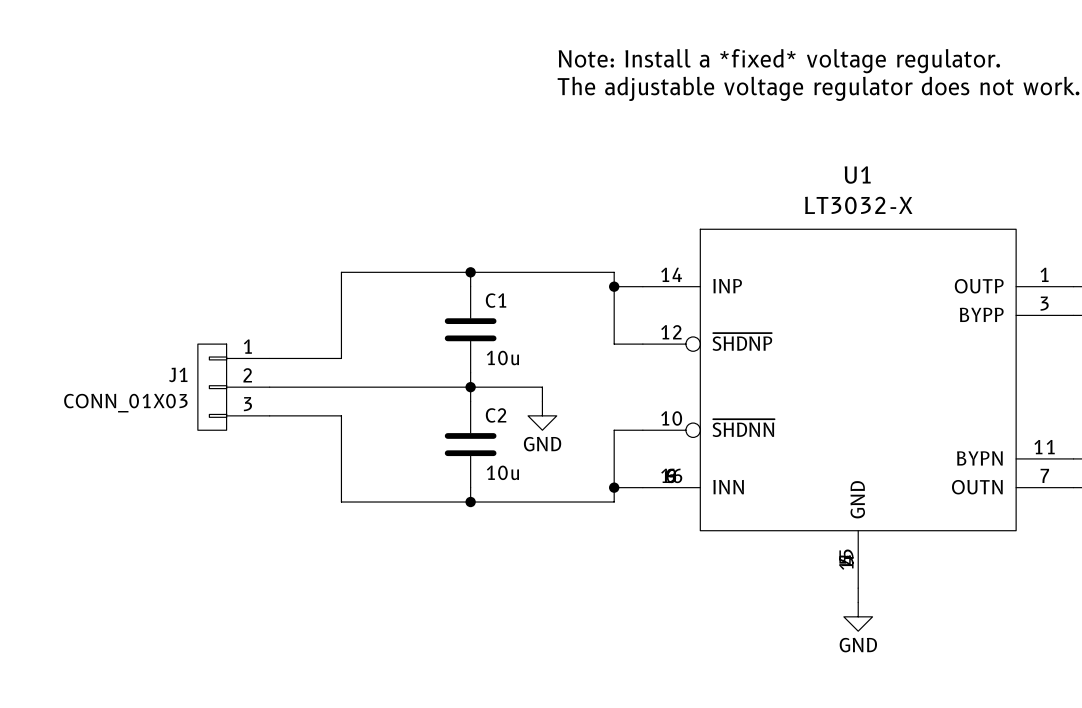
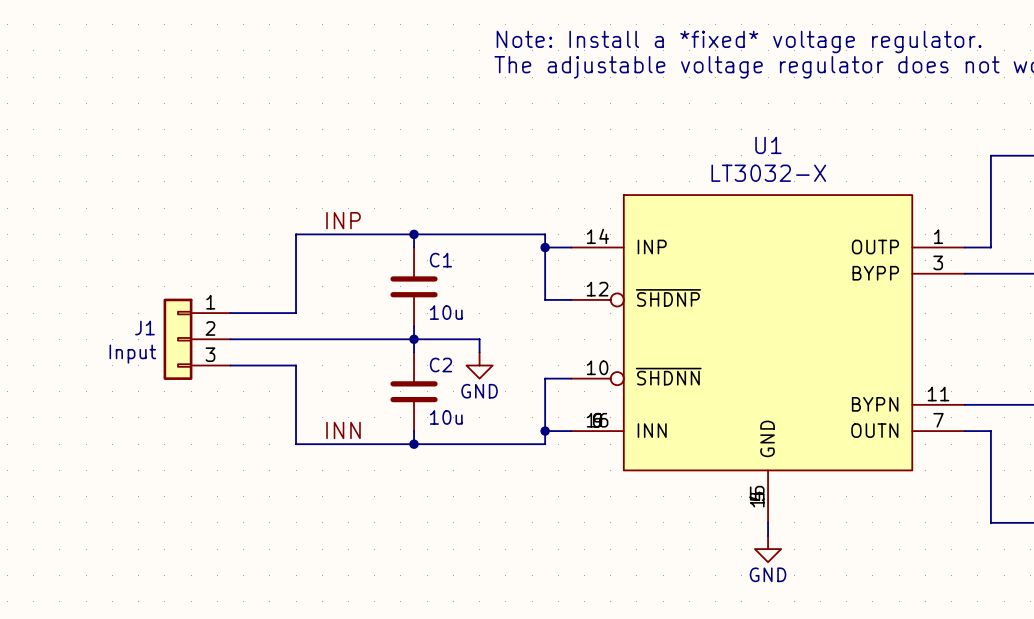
label: none -> INP (343, 220)
J1 symbol: [197, 344, 270, 431] -> [163, 298, 231, 380]
J1 value: CONN_01X03 (125, 403) -> Input (132, 354)
label: none -> INN (343, 430)

